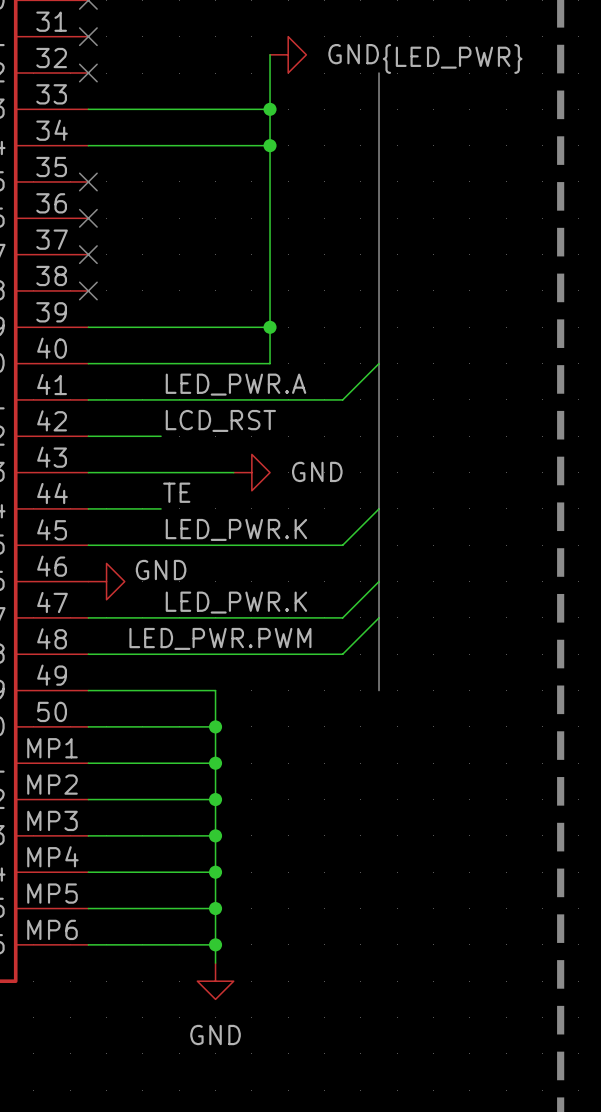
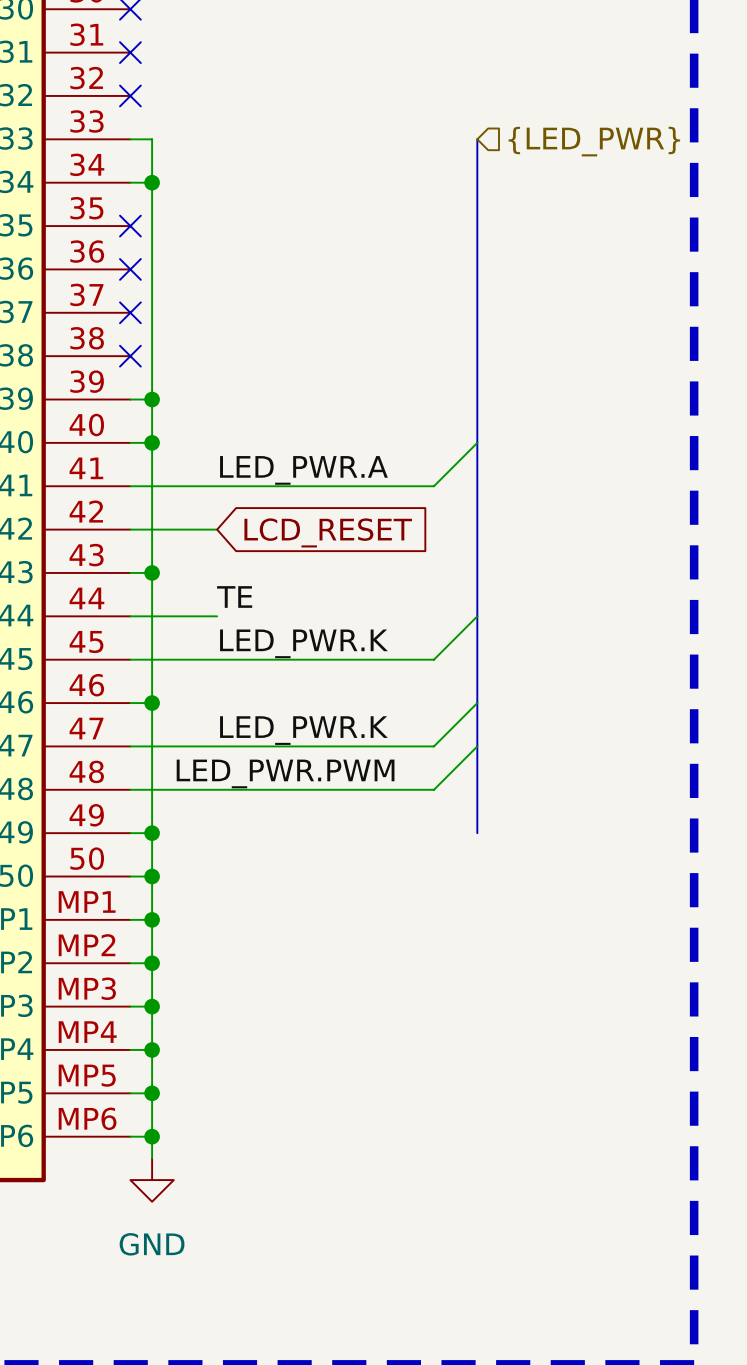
wire: (270, 54) (270, 363) (106, 363) -> none
power symbol: GND (288, 54) -> none
label: {LED_PWR} (452, 58) -> none
bus: (379, 73) (379, 109) -> none
wire: (106, 109) (270, 109) -> (152, 139) (152, 1158)
junction: (270, 109) -> none
hierarchical label: none -> {LED_PWR} (594, 141)
wire: (106, 145) (270, 145) -> none
junction: none -> (152, 182)
junction: (270, 145) -> none
wire: (106, 327) (270, 327) -> none
junction: none -> (152, 399)
junction: (270, 327) -> none
junction: none -> (152, 442)
label: LCD_RST (220, 420) -> none
global label: none -> LCD_RESET (328, 532)
wire: (106, 472) (233, 472) -> none
junction: none -> (152, 572)
power symbol: GND (251, 472) -> none
junction: none -> (152, 703)
power symbol: GND (106, 581) -> none
wire: (106, 690) (215, 690) (215, 963) -> none
junction: none -> (152, 833)
wire: (106, 726) (215, 726) -> none
junction: none -> (152, 876)
junction: (215, 726) -> none
wire: (106, 763) (215, 763) -> none
junction: none -> (152, 919)
junction: (215, 763) -> none
wire: (106, 799) (215, 799) -> none
junction: none -> (152, 963)
junction: (215, 799) -> none
wire: (106, 835) (215, 835) -> none
junction: none -> (152, 1006)
junction: (215, 835) -> none
wire: (106, 872) (215, 872) -> none
junction: none -> (152, 1049)
junction: (215, 872) -> none
wire: (106, 908) (215, 908) -> none
junction: none -> (152, 1093)
junction: (215, 908) -> none
wire: (106, 944) (215, 944) -> none
junction: none -> (152, 1136)
junction: (215, 944) -> none
power symbol position: GND (215, 981) -> GND (152, 1180)

